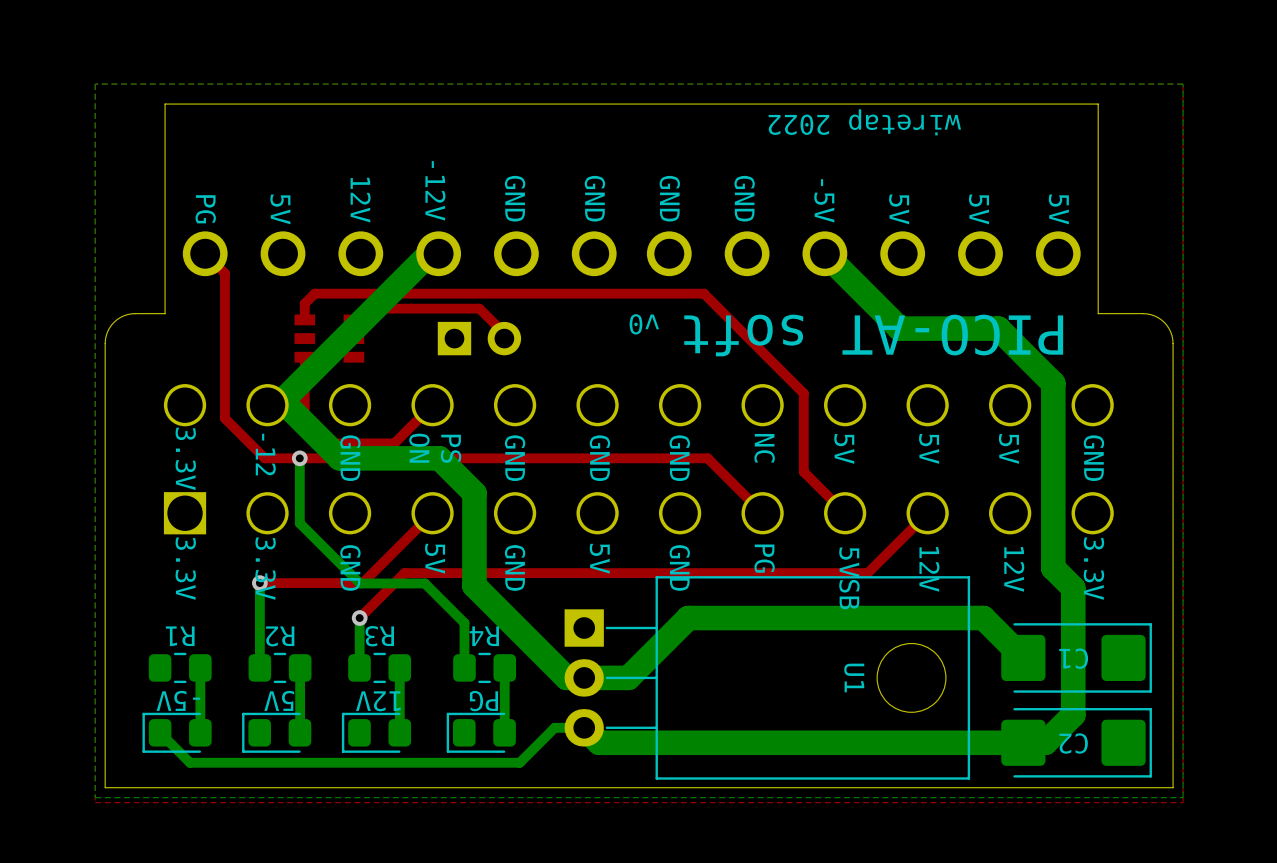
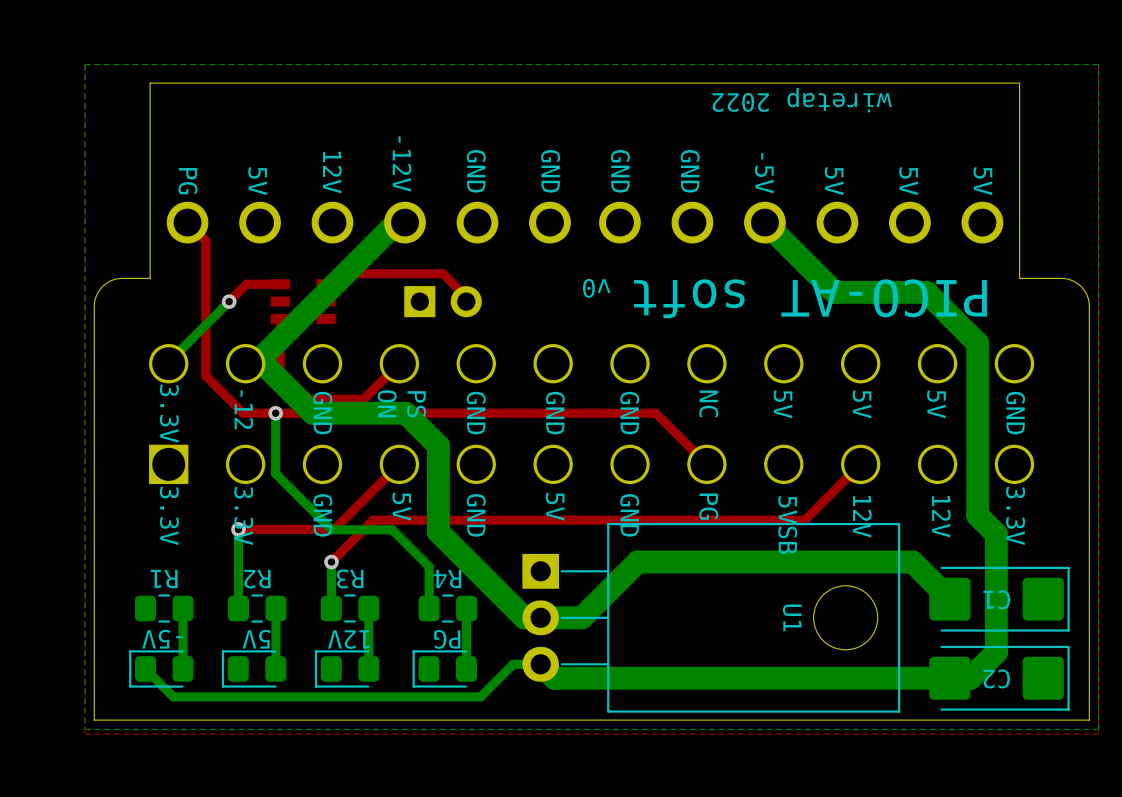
top track: (304, 319) (304, 303) (314, 293) (703, 293) (803, 393) (803, 471) (845, 513) -> (280, 284) (246, 284) (229, 301)
bottom track: none -> (229, 301) (168, 362)
via: none -> (229, 301)

